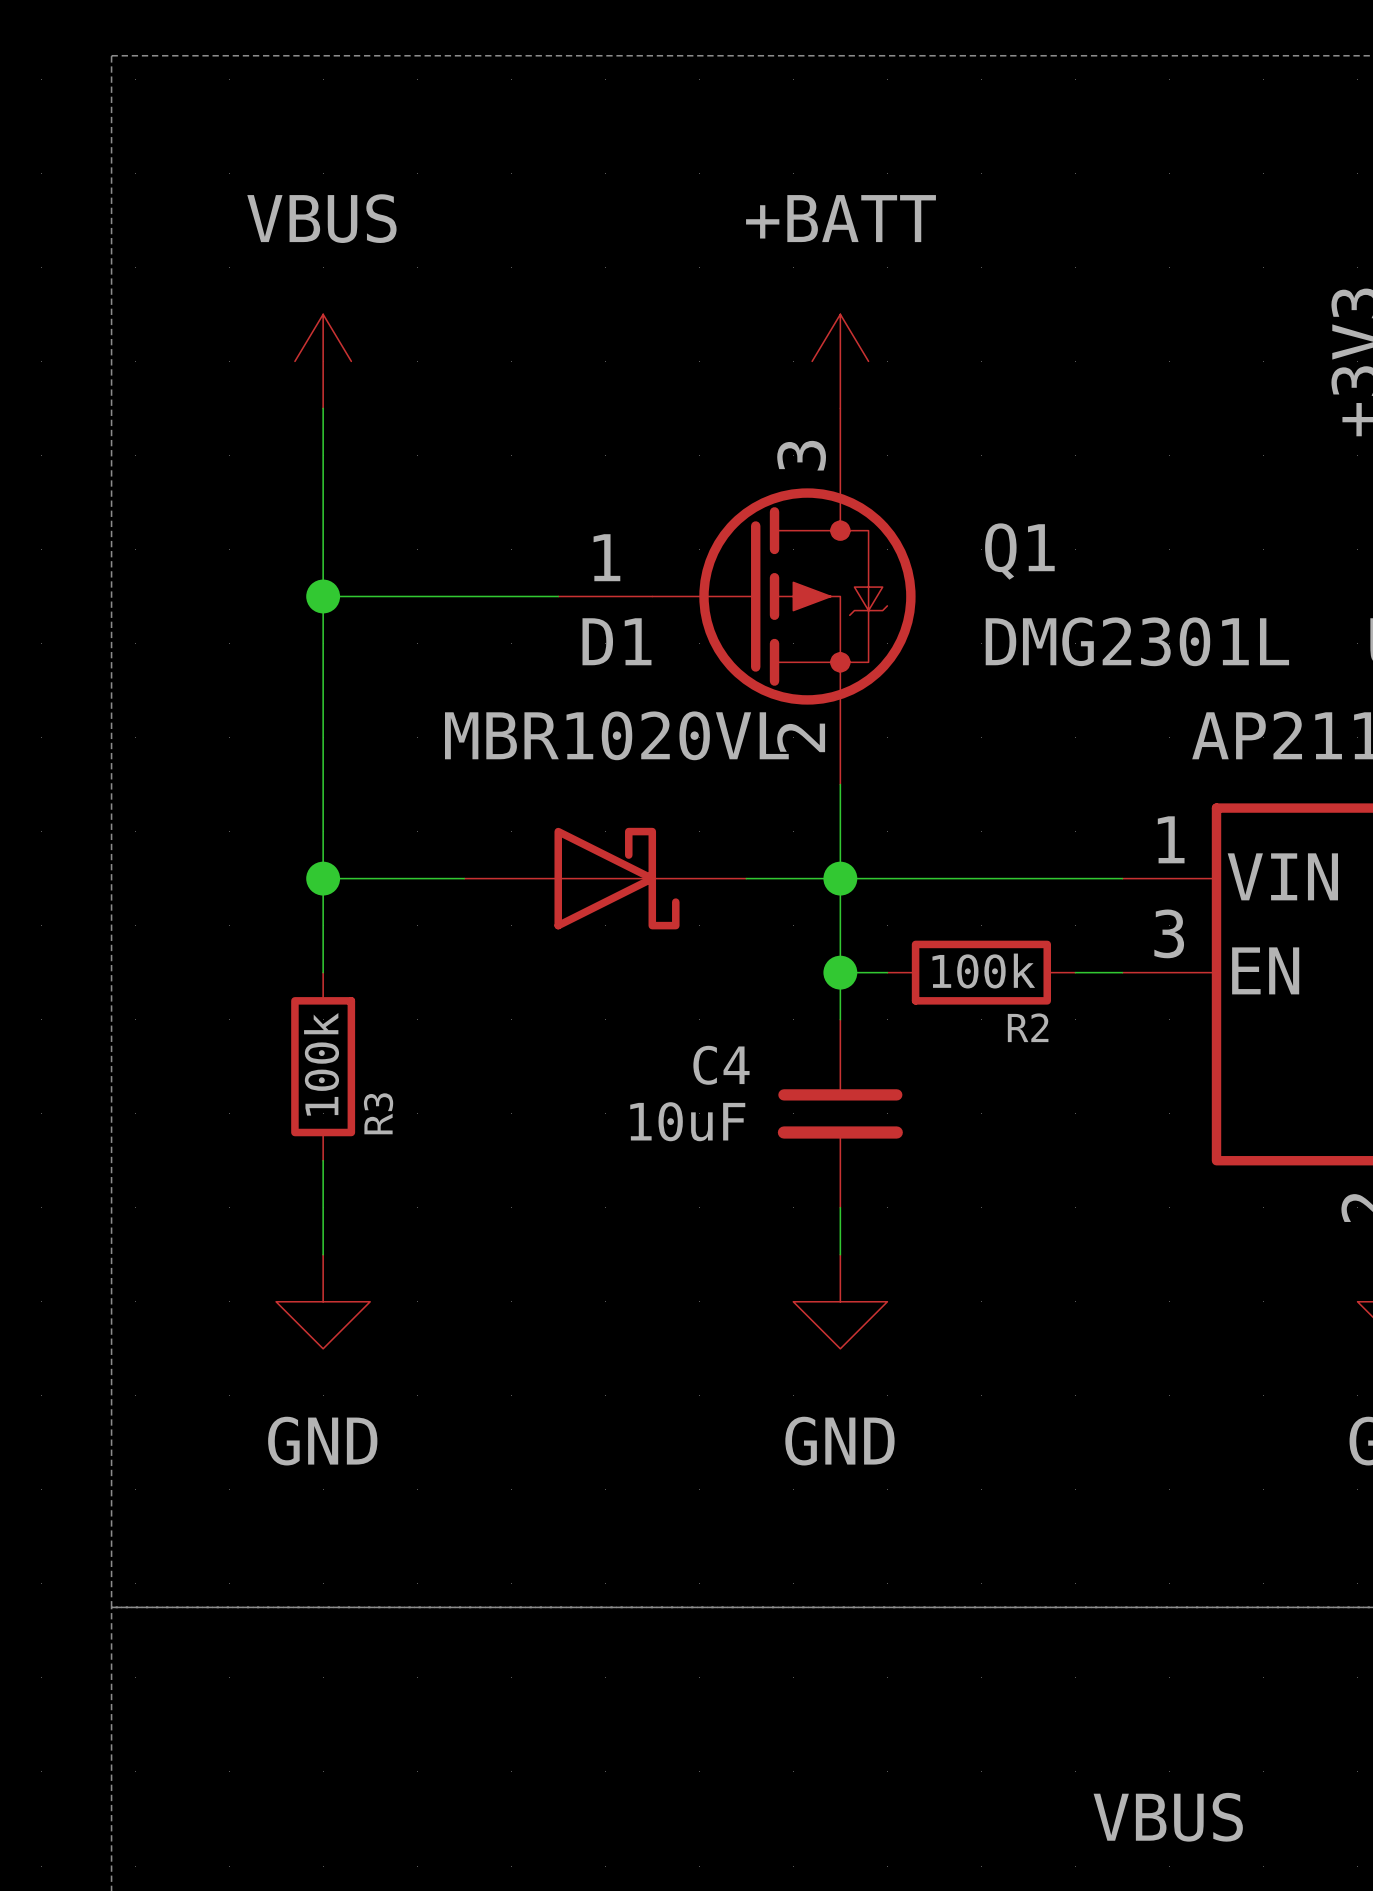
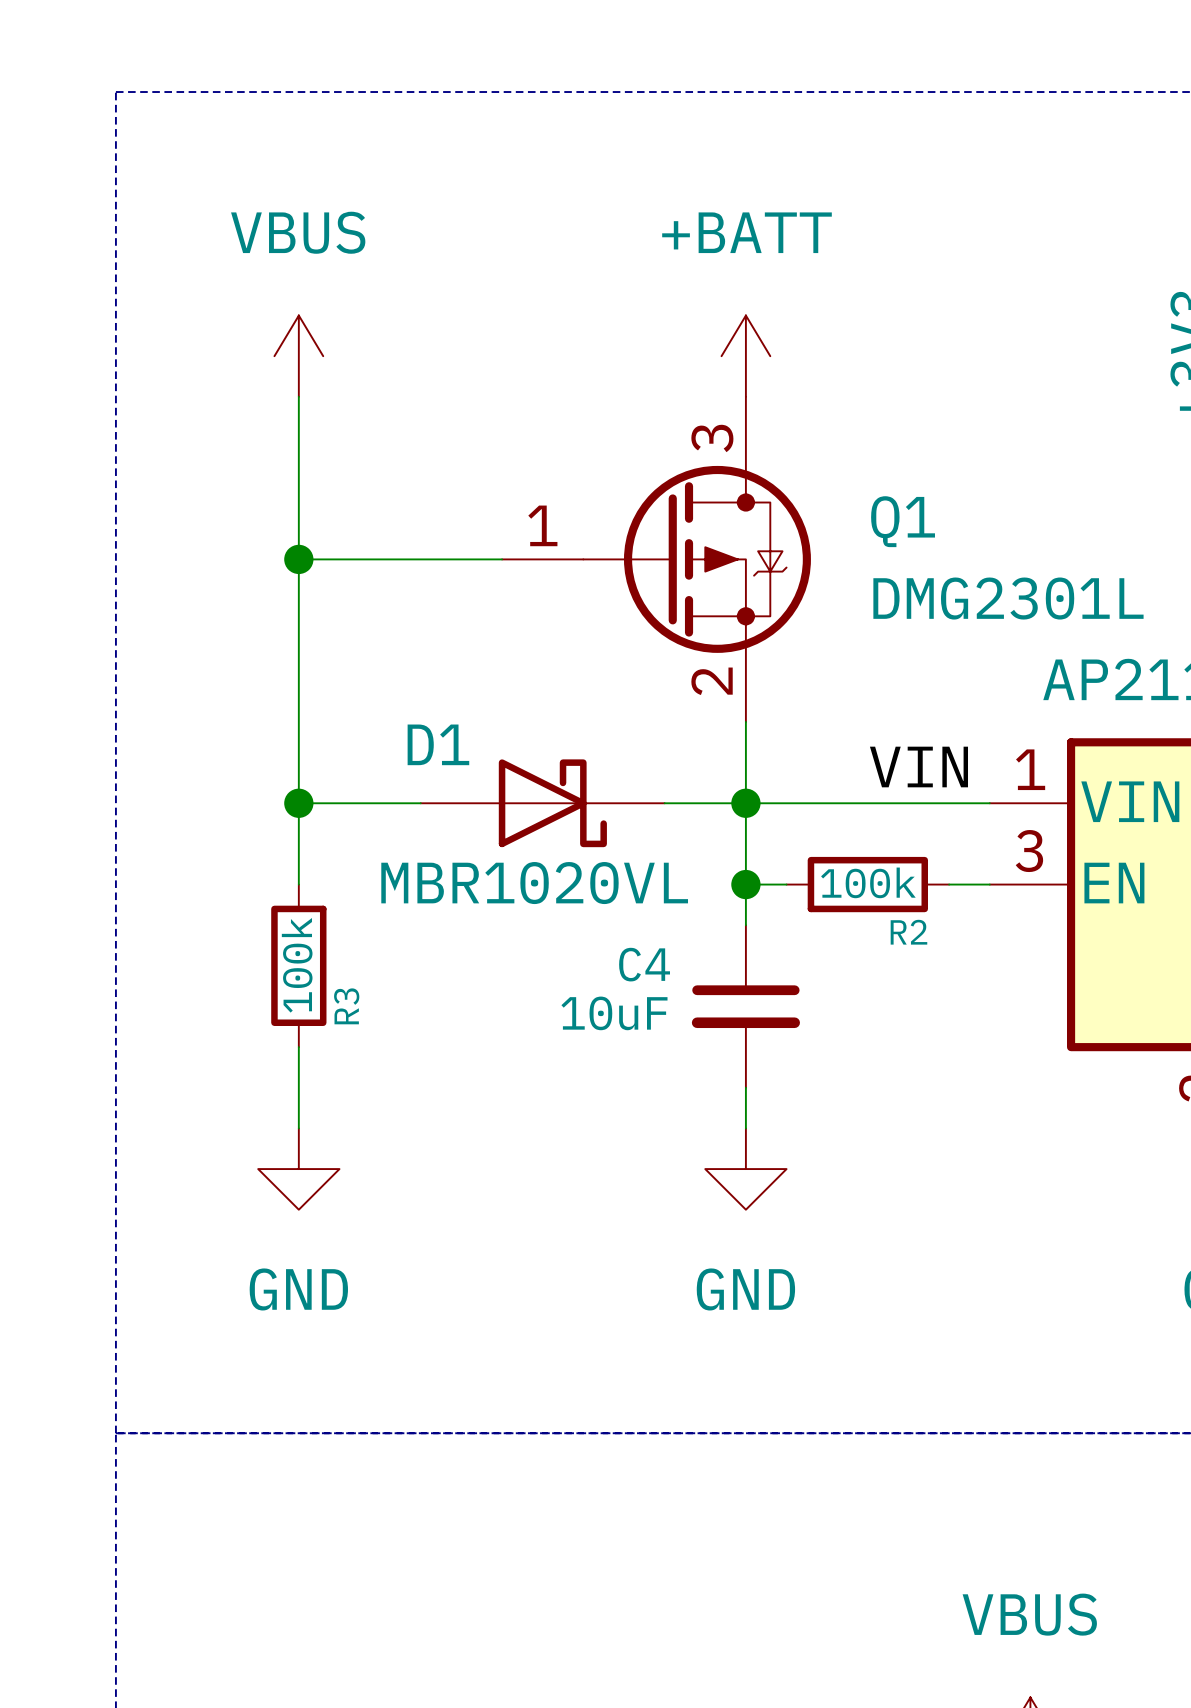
D1 name position: D1 (616, 641) -> D1 (438, 744)
D1 value position: MBR1020VL (616, 735) -> MBR1020VL (534, 883)
label: none -> VIN (918, 767)

